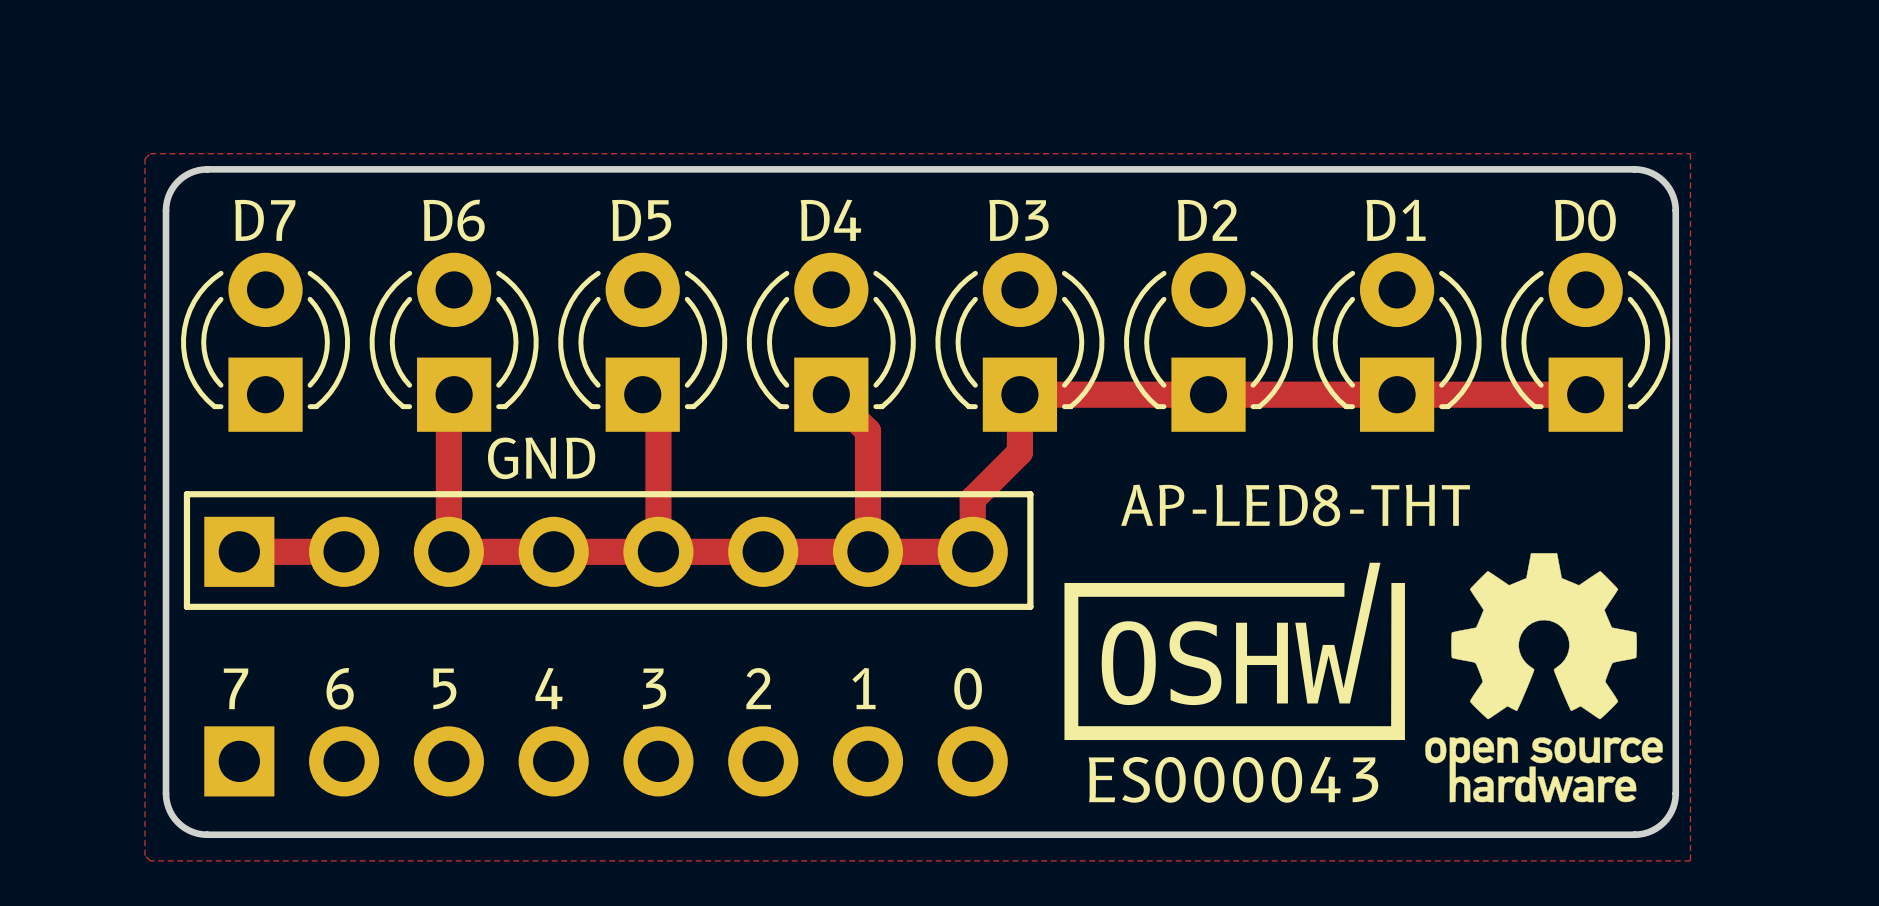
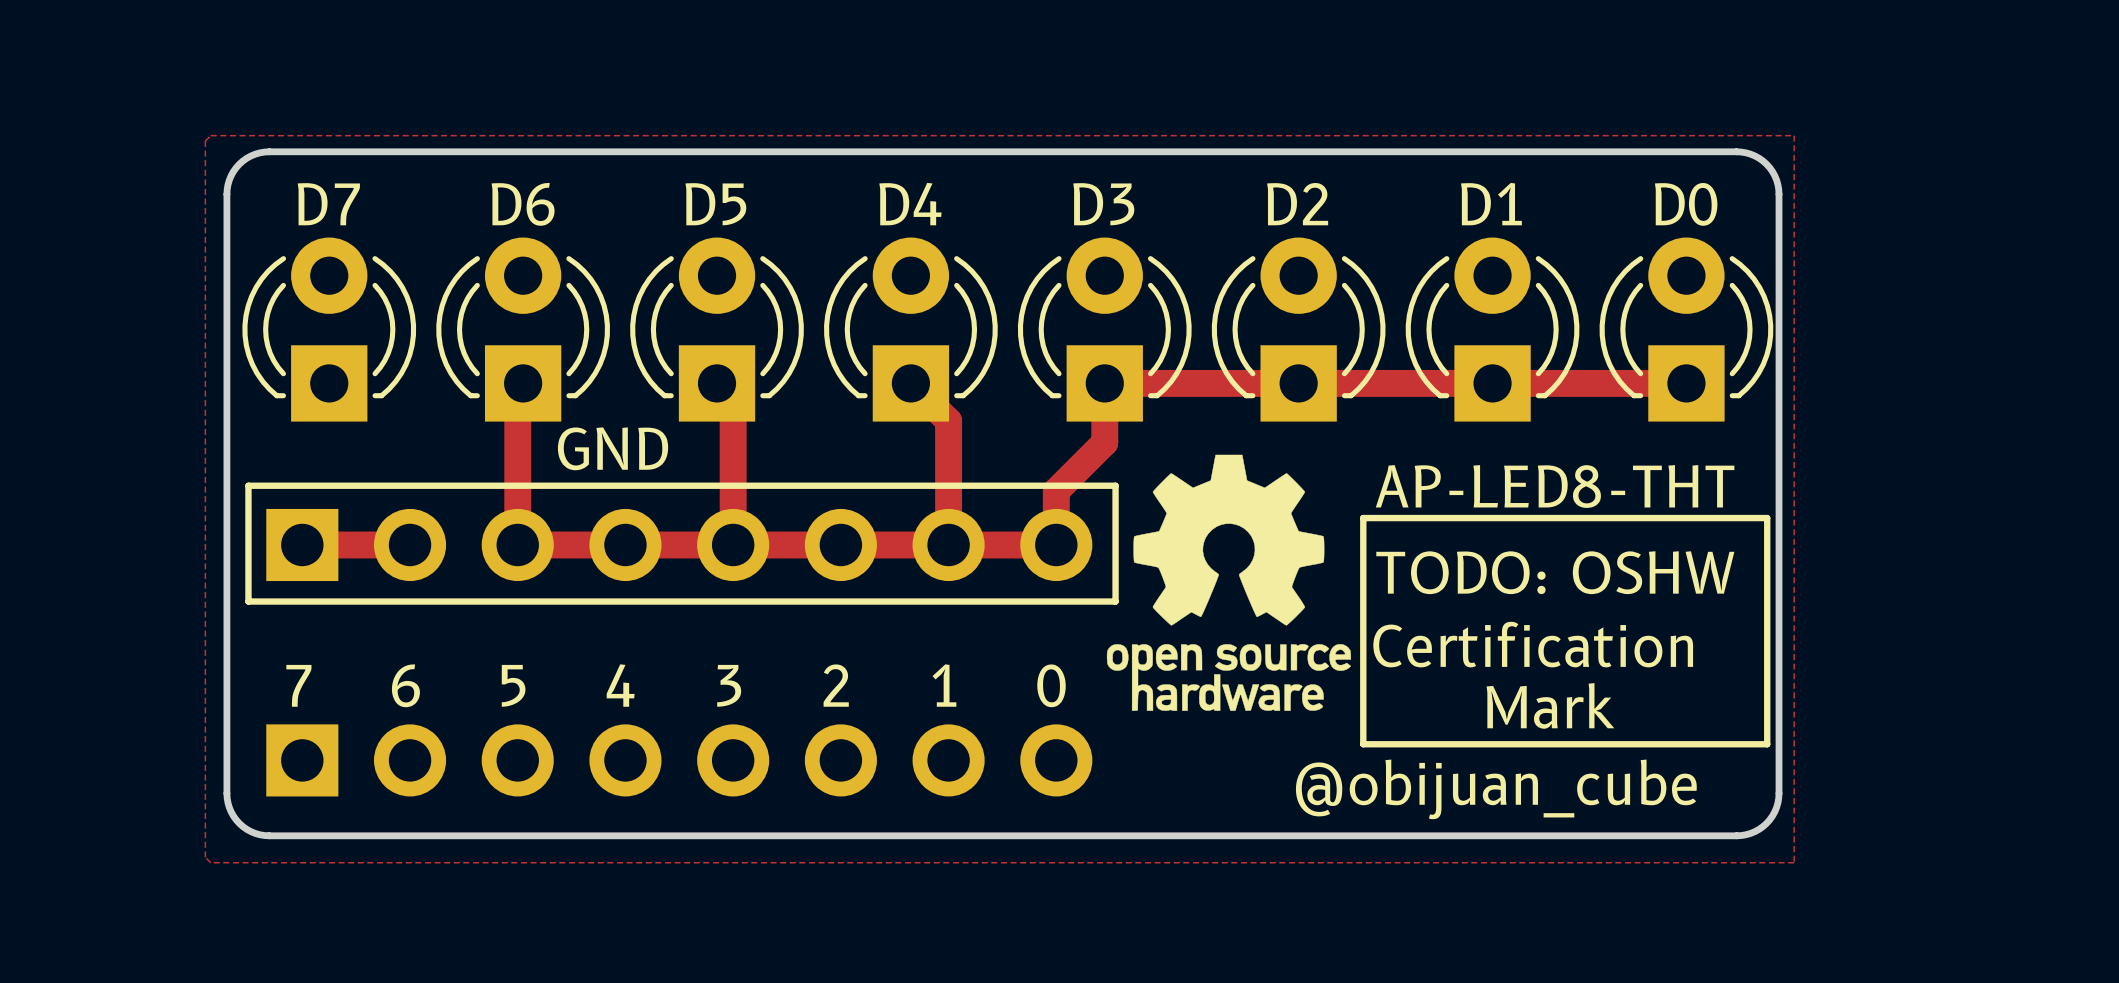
text position: AP-LED8-THT (1295, 505) -> AP-LED8-THT (1555, 486)
line: none -> (1363, 518) (1767, 518) (1767, 744) (1363, 744) (1363, 518)
drawing: [1064, 562, 1405, 741] -> none
text: none -> TODO: OSHW (1555, 572)
text: none -> Certification (1533, 644)
drawing position: (1544, 677) -> (1228, 582)
text: none -> Mark (1550, 705)
text: none -> @obijuan_cube (1496, 789)

